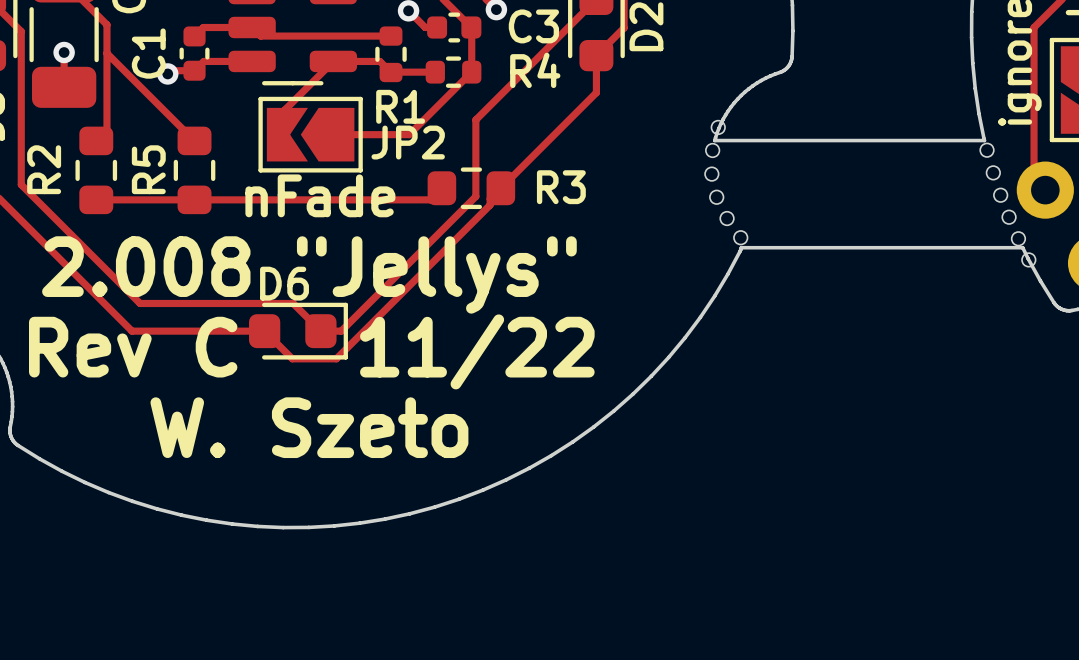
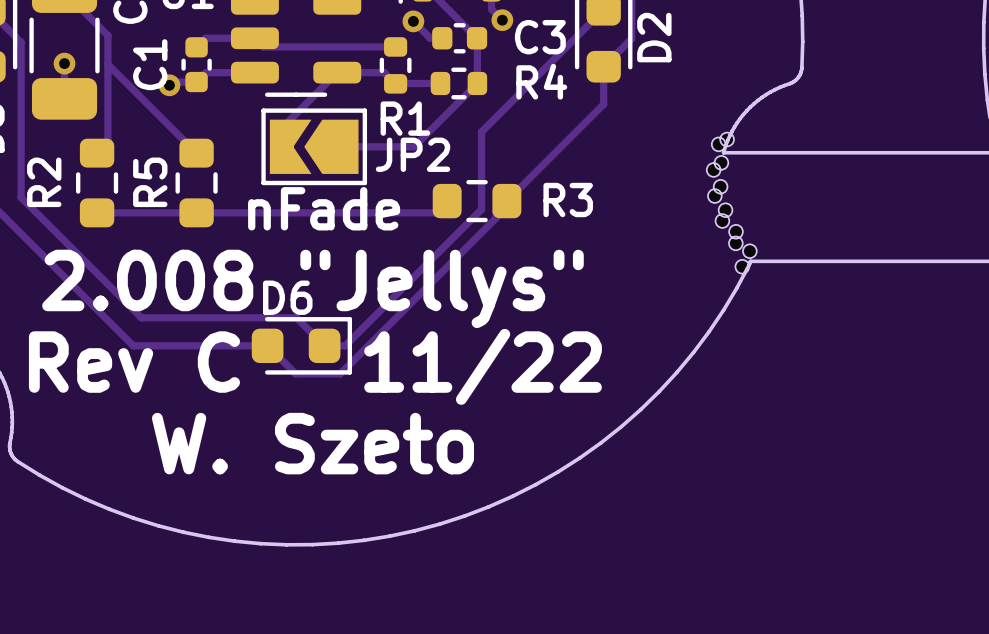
part: none -> (718, 144)
part: none -> (713, 169)
part: none -> (714, 196)
part: none -> (722, 221)
part: none -> (735, 243)
part: none -> (742, 266)

